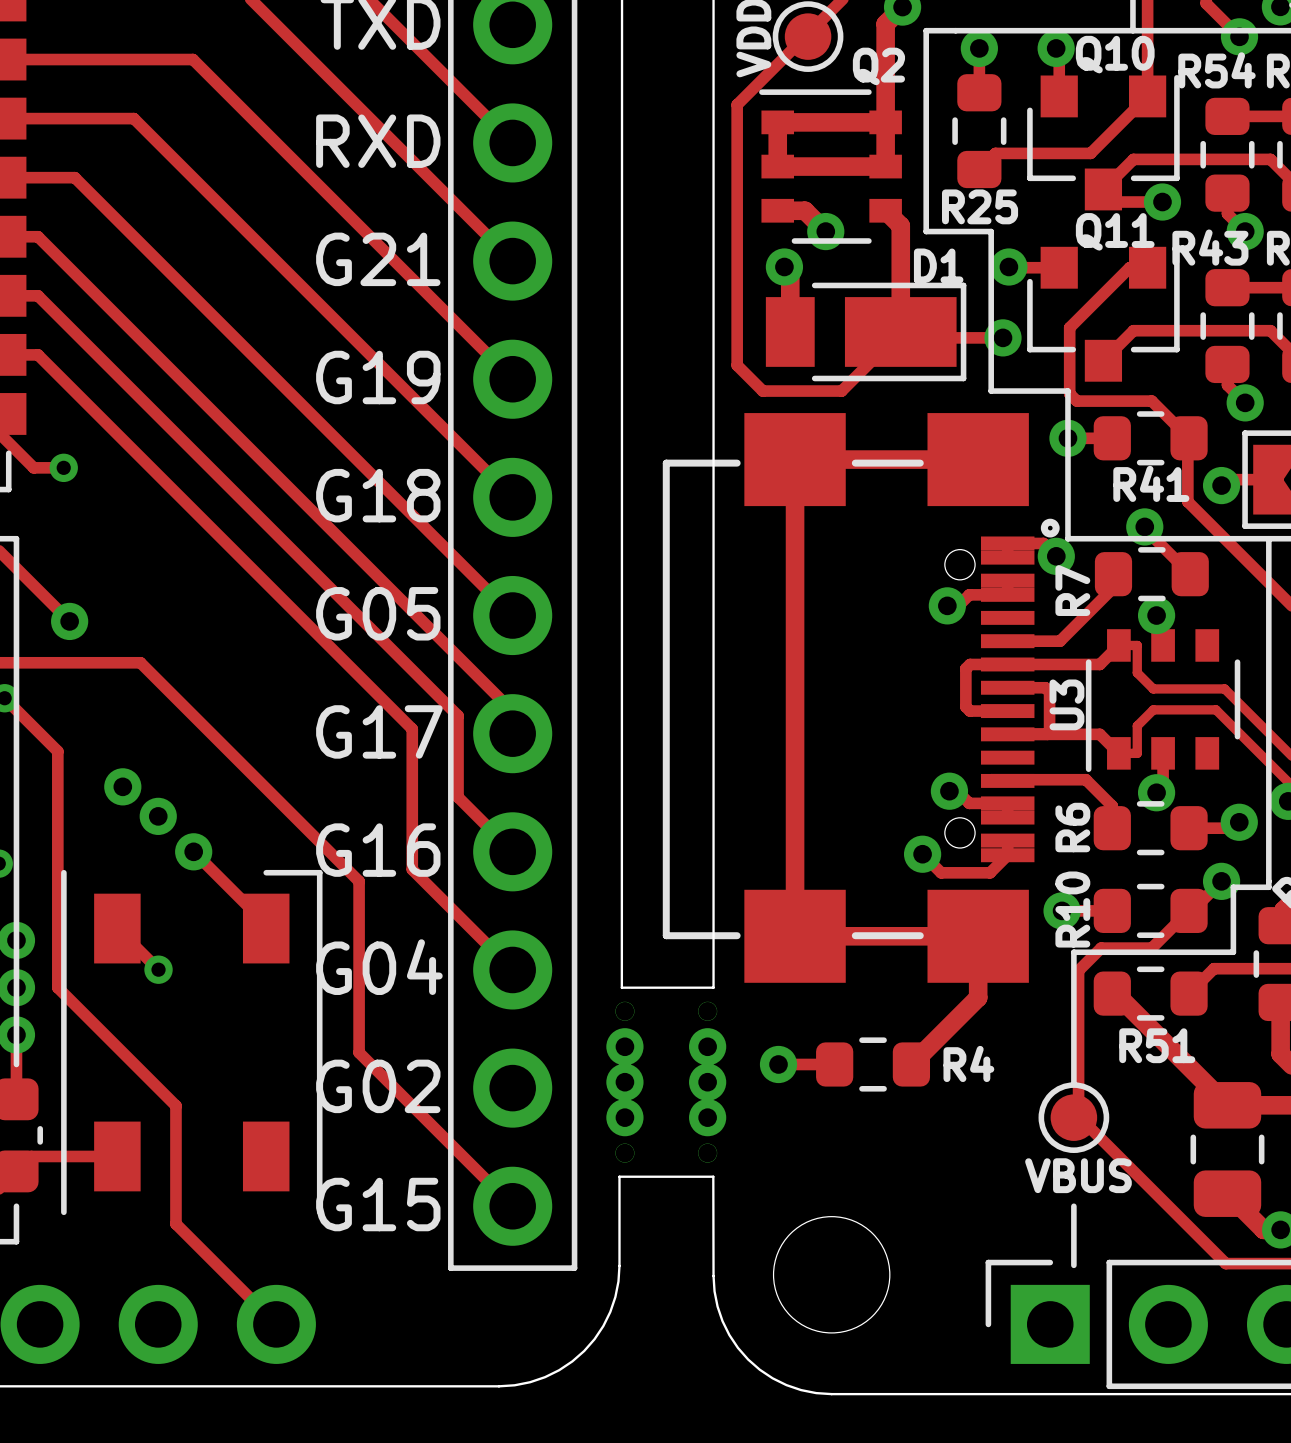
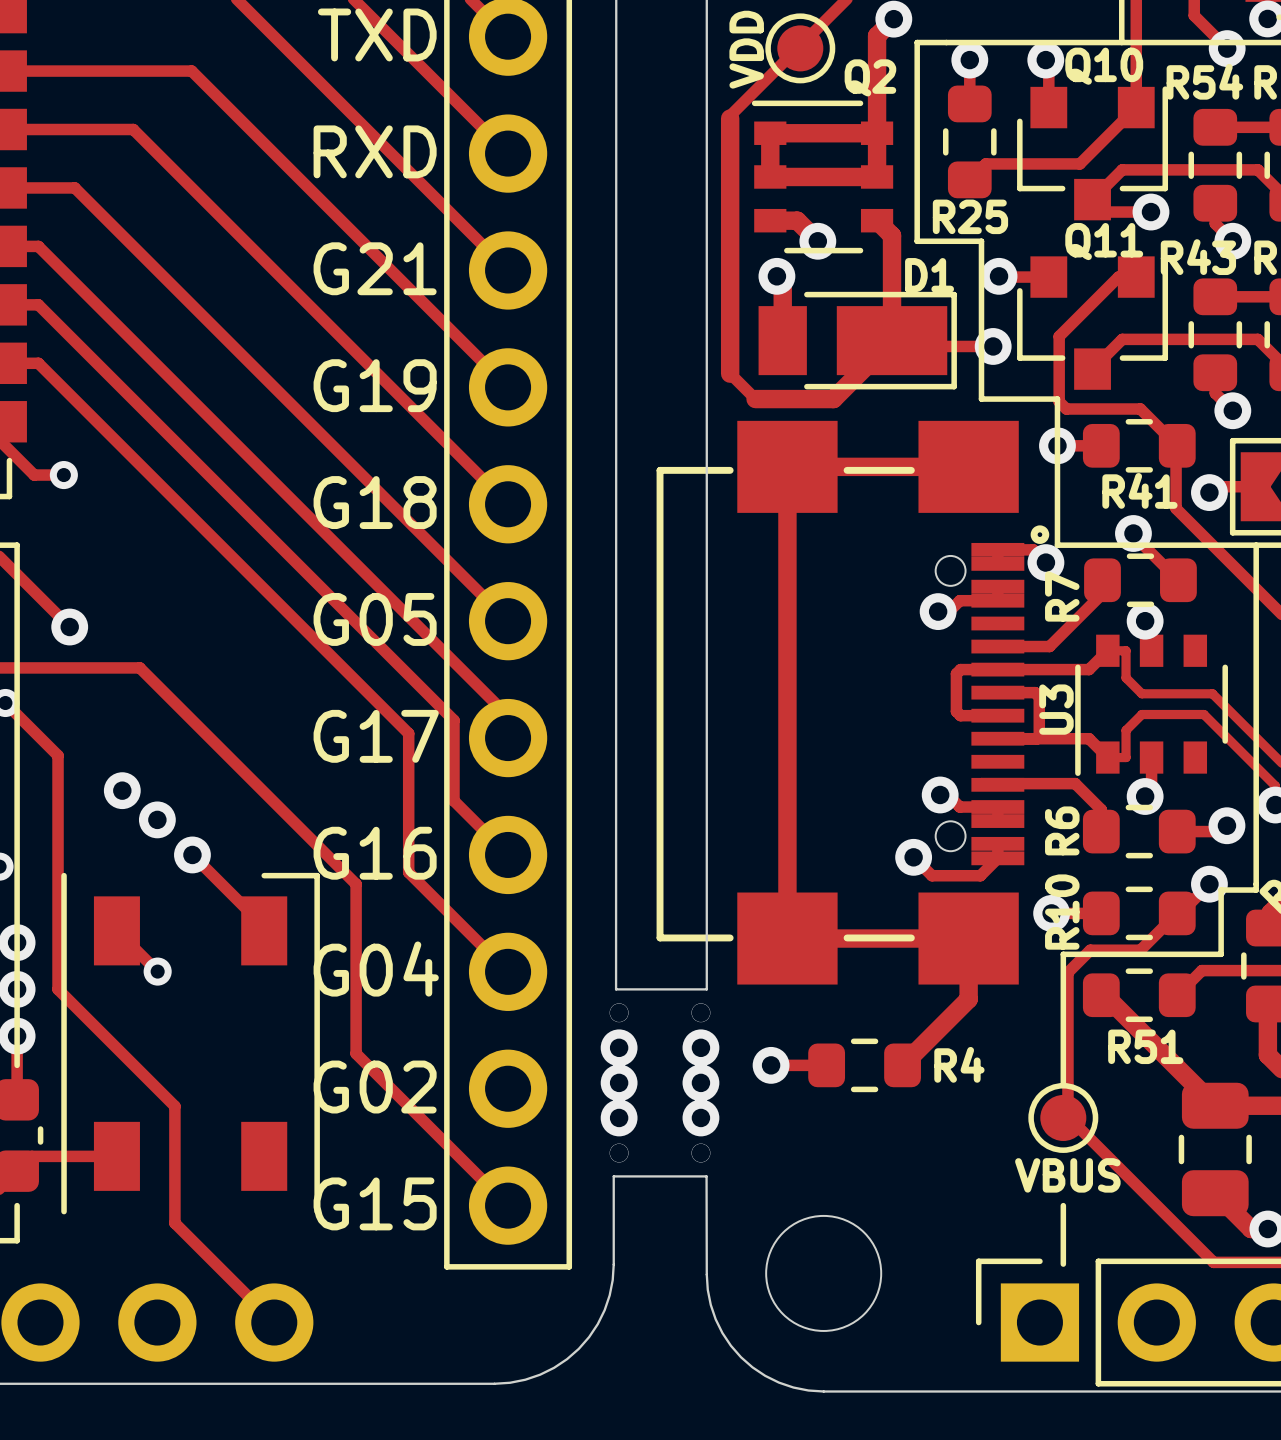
track width: thin (737, 107) (737, 365) -> thick (730, 118) (730, 373)
track width: thin (900, 331) (841, 391) (762, 391) -> thick (892, 340) (833, 399) (755, 399)

